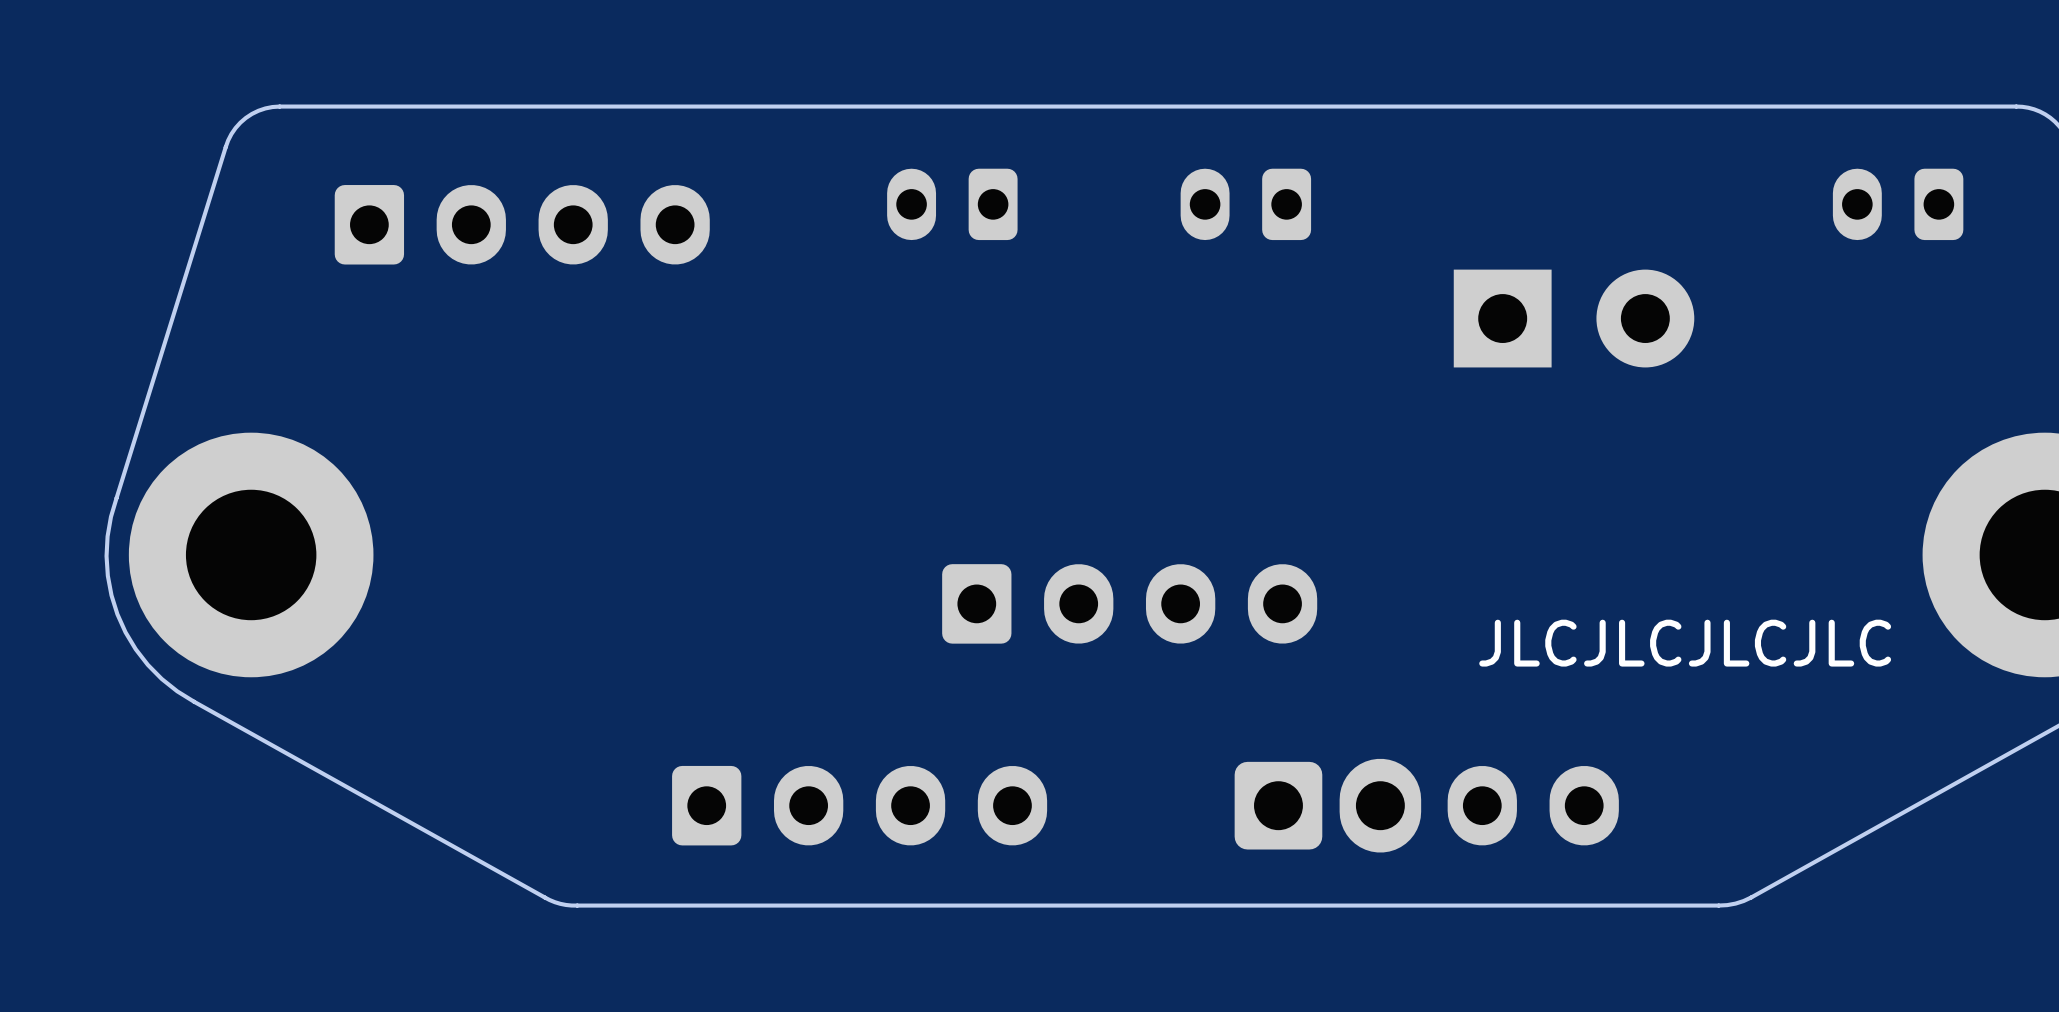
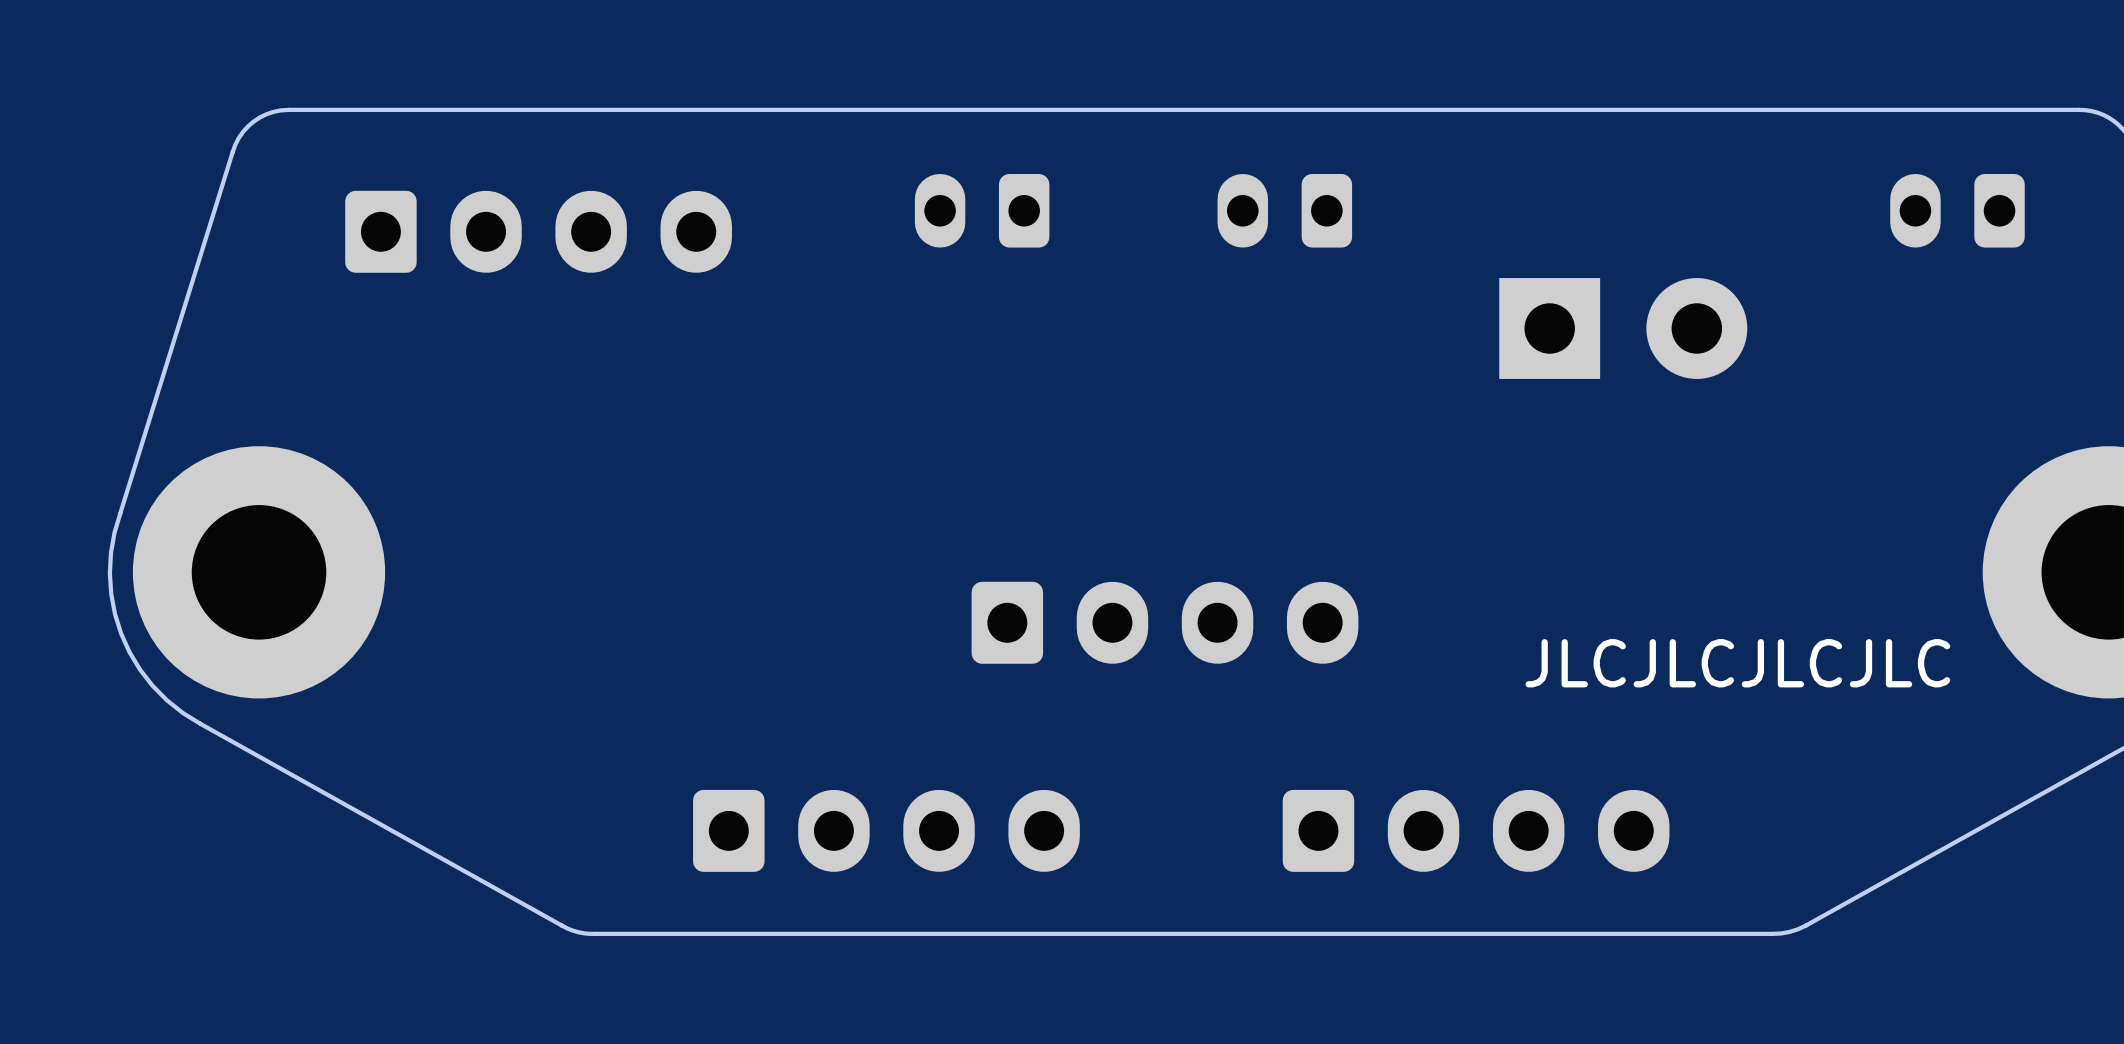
part footprint: [1234, 758, 1619, 853] -> [1282, 789, 1670, 872]

